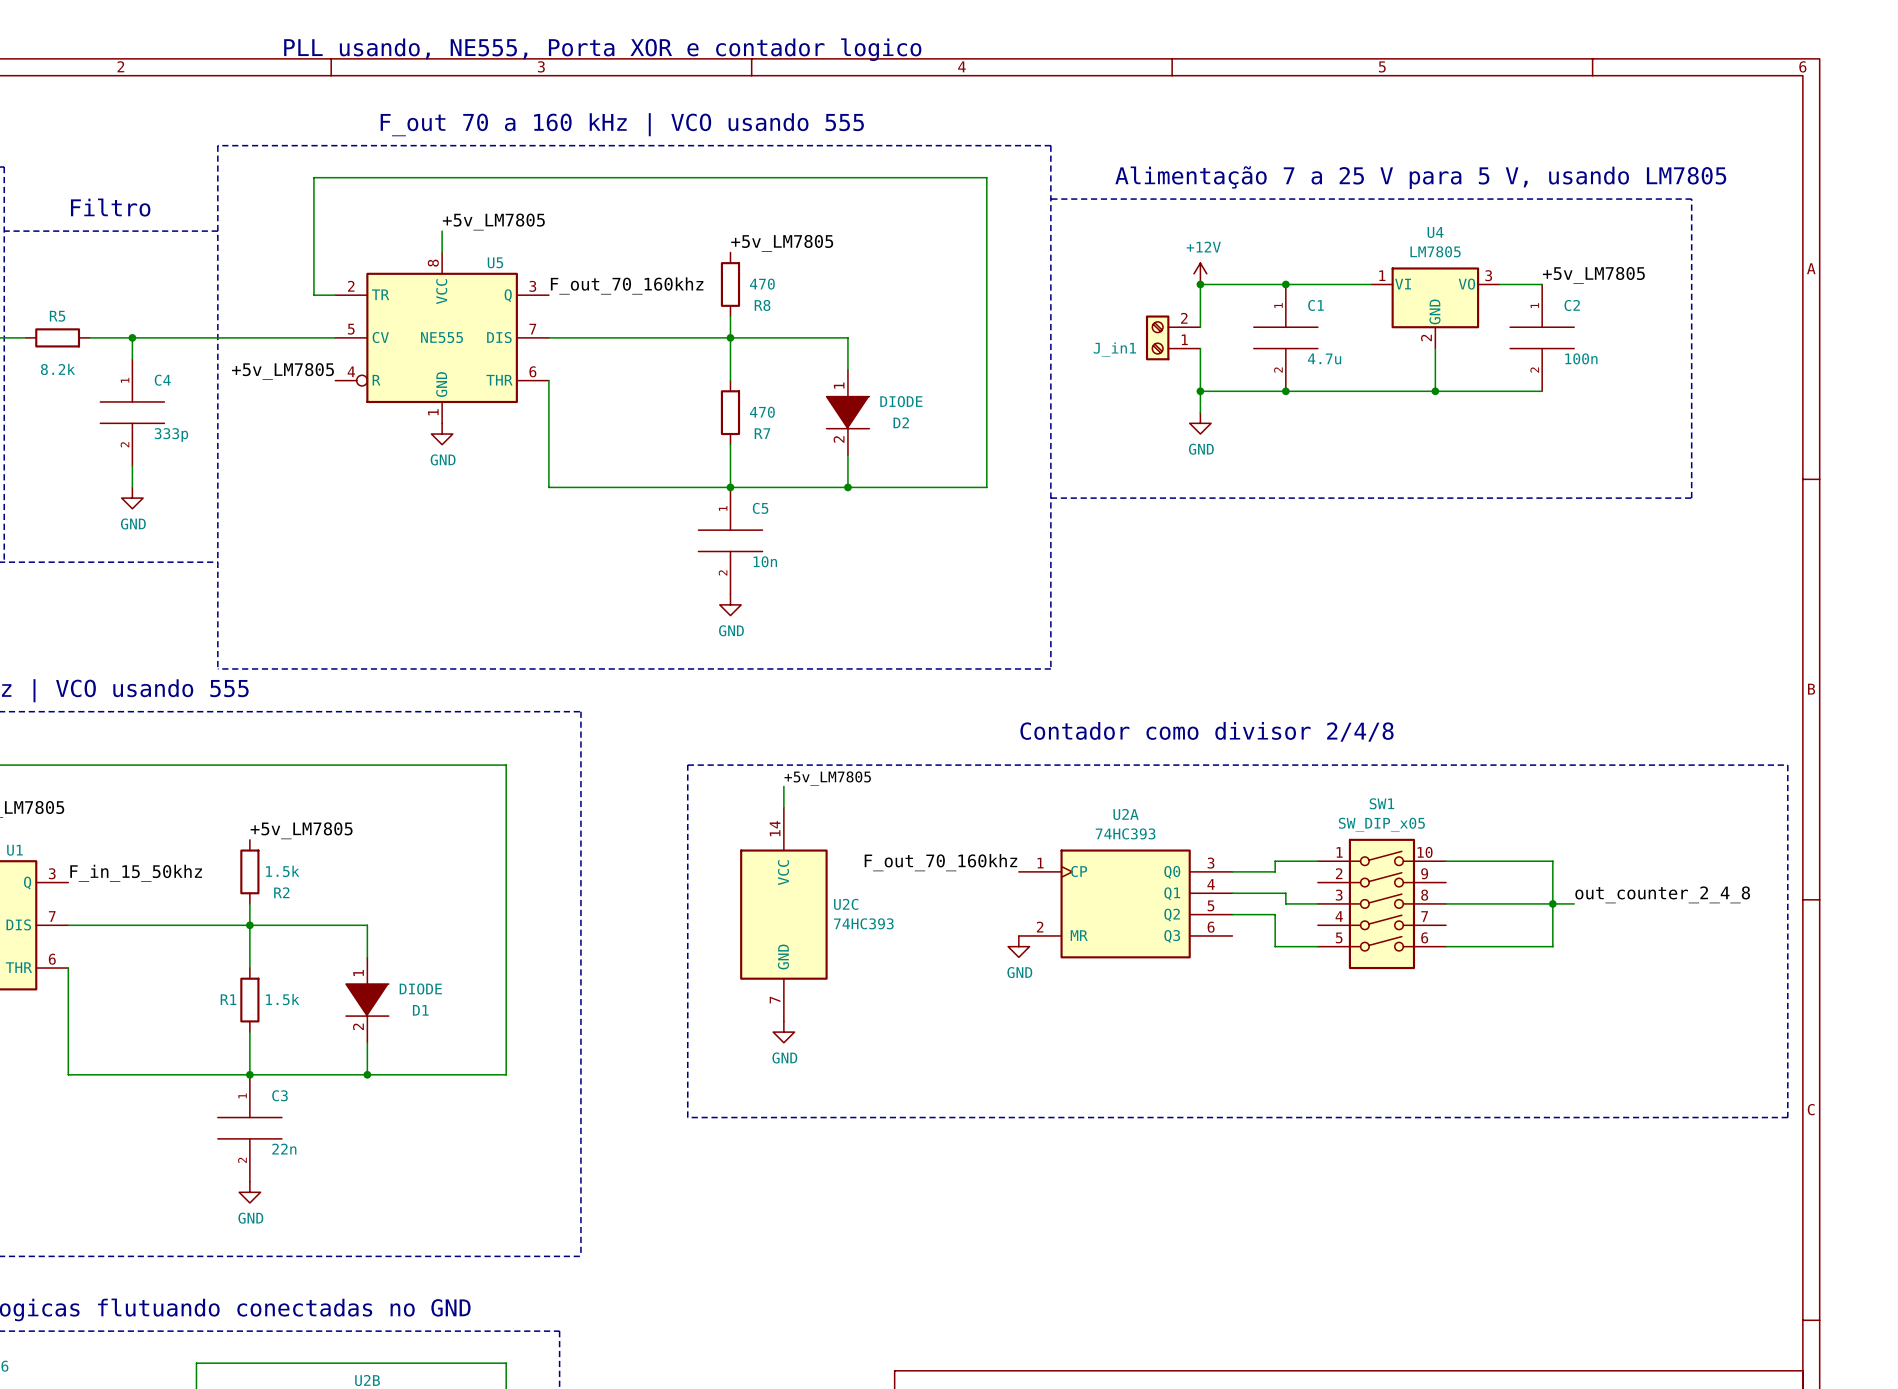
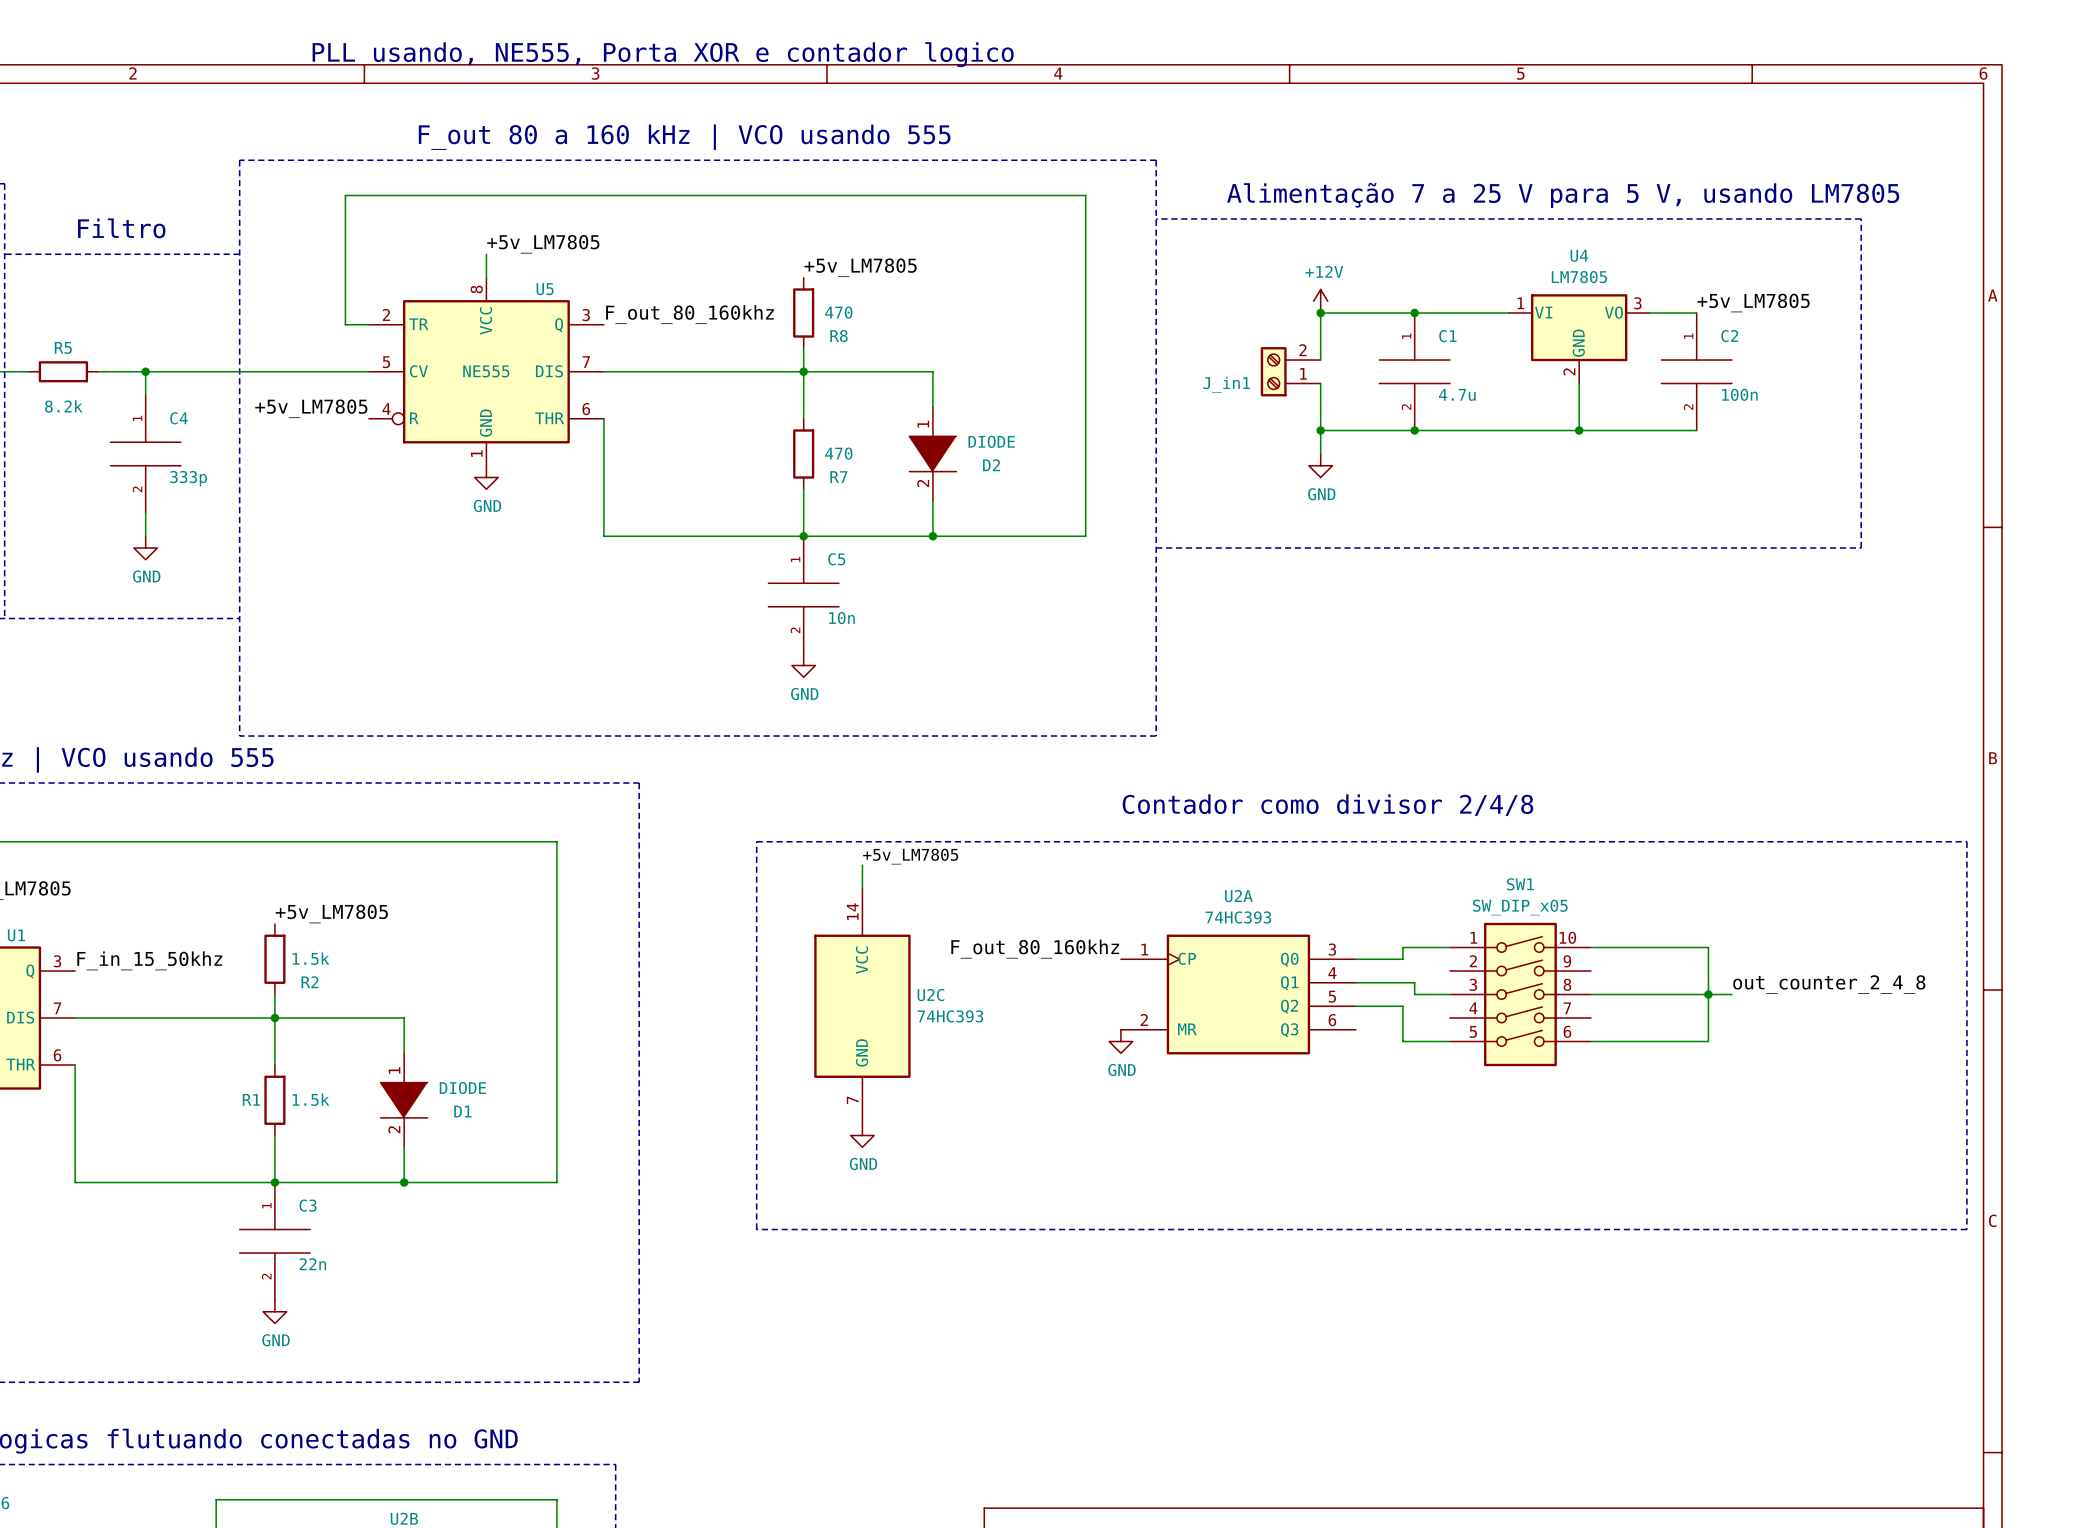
text: F_out 70 a 160 kHz | VCO usando 555 (622, 124) -> F_out 80 a 160 kHz | VCO usando 555 (684, 137)
label: F_out_70_160khz (627, 285) -> F_out_80_160khz (689, 314)
label: F_out_70_160khz (940, 862) -> F_out_80_160khz (1035, 949)

